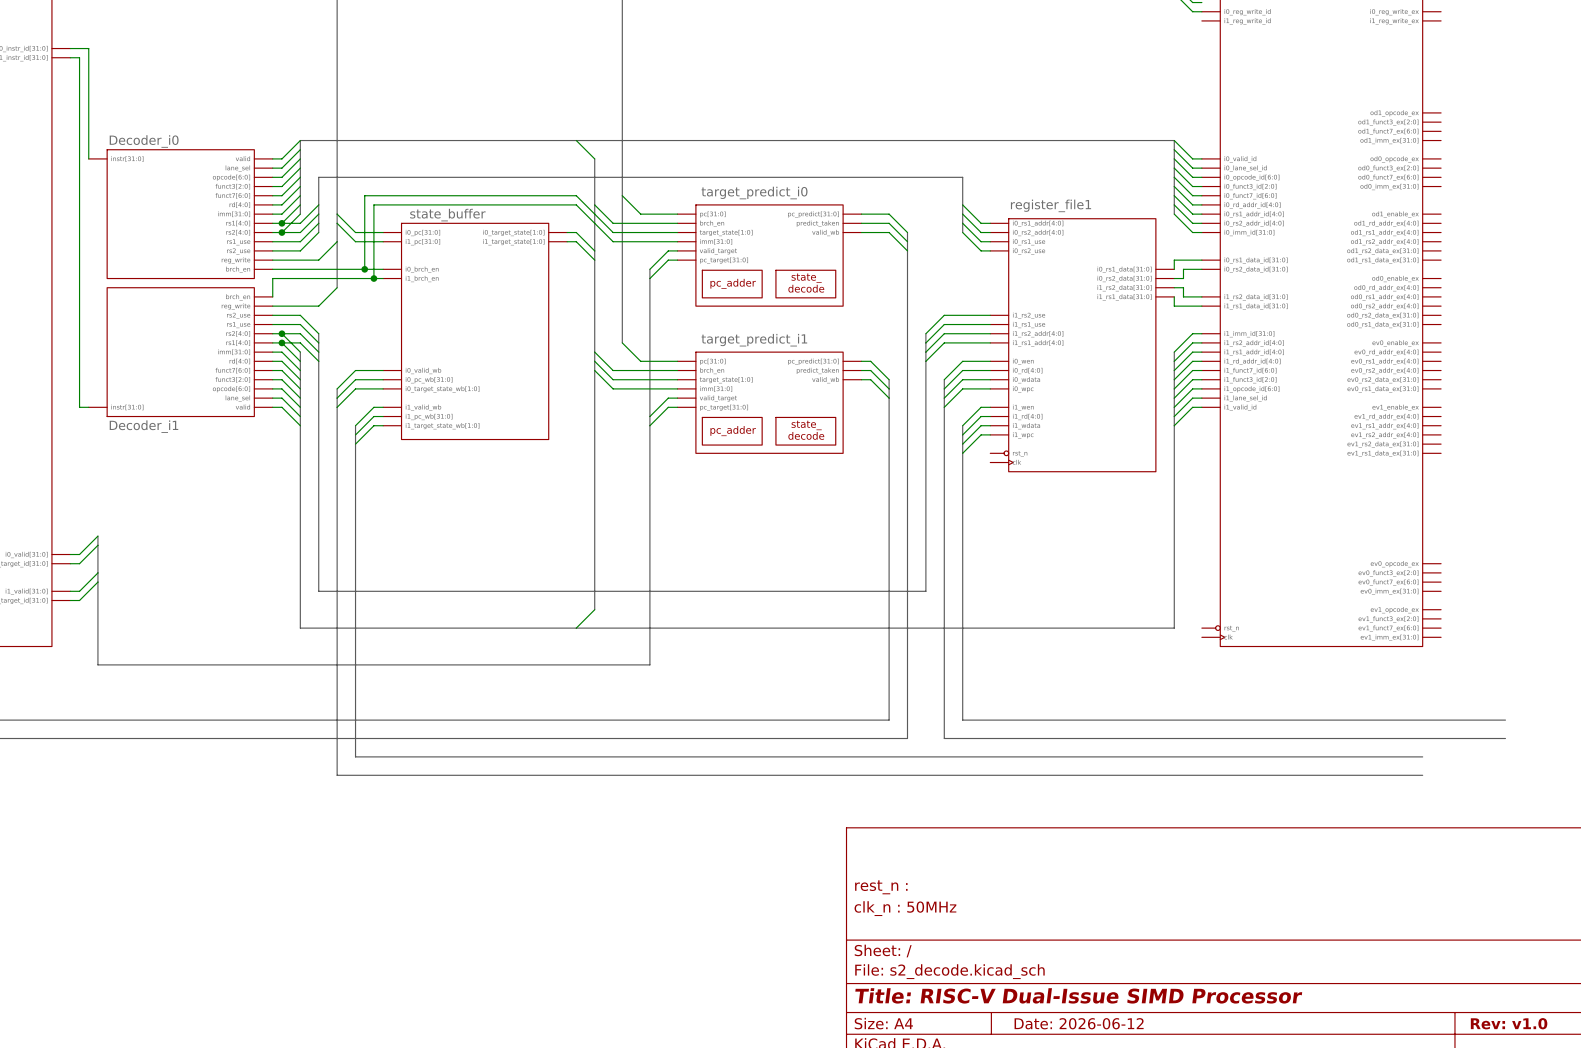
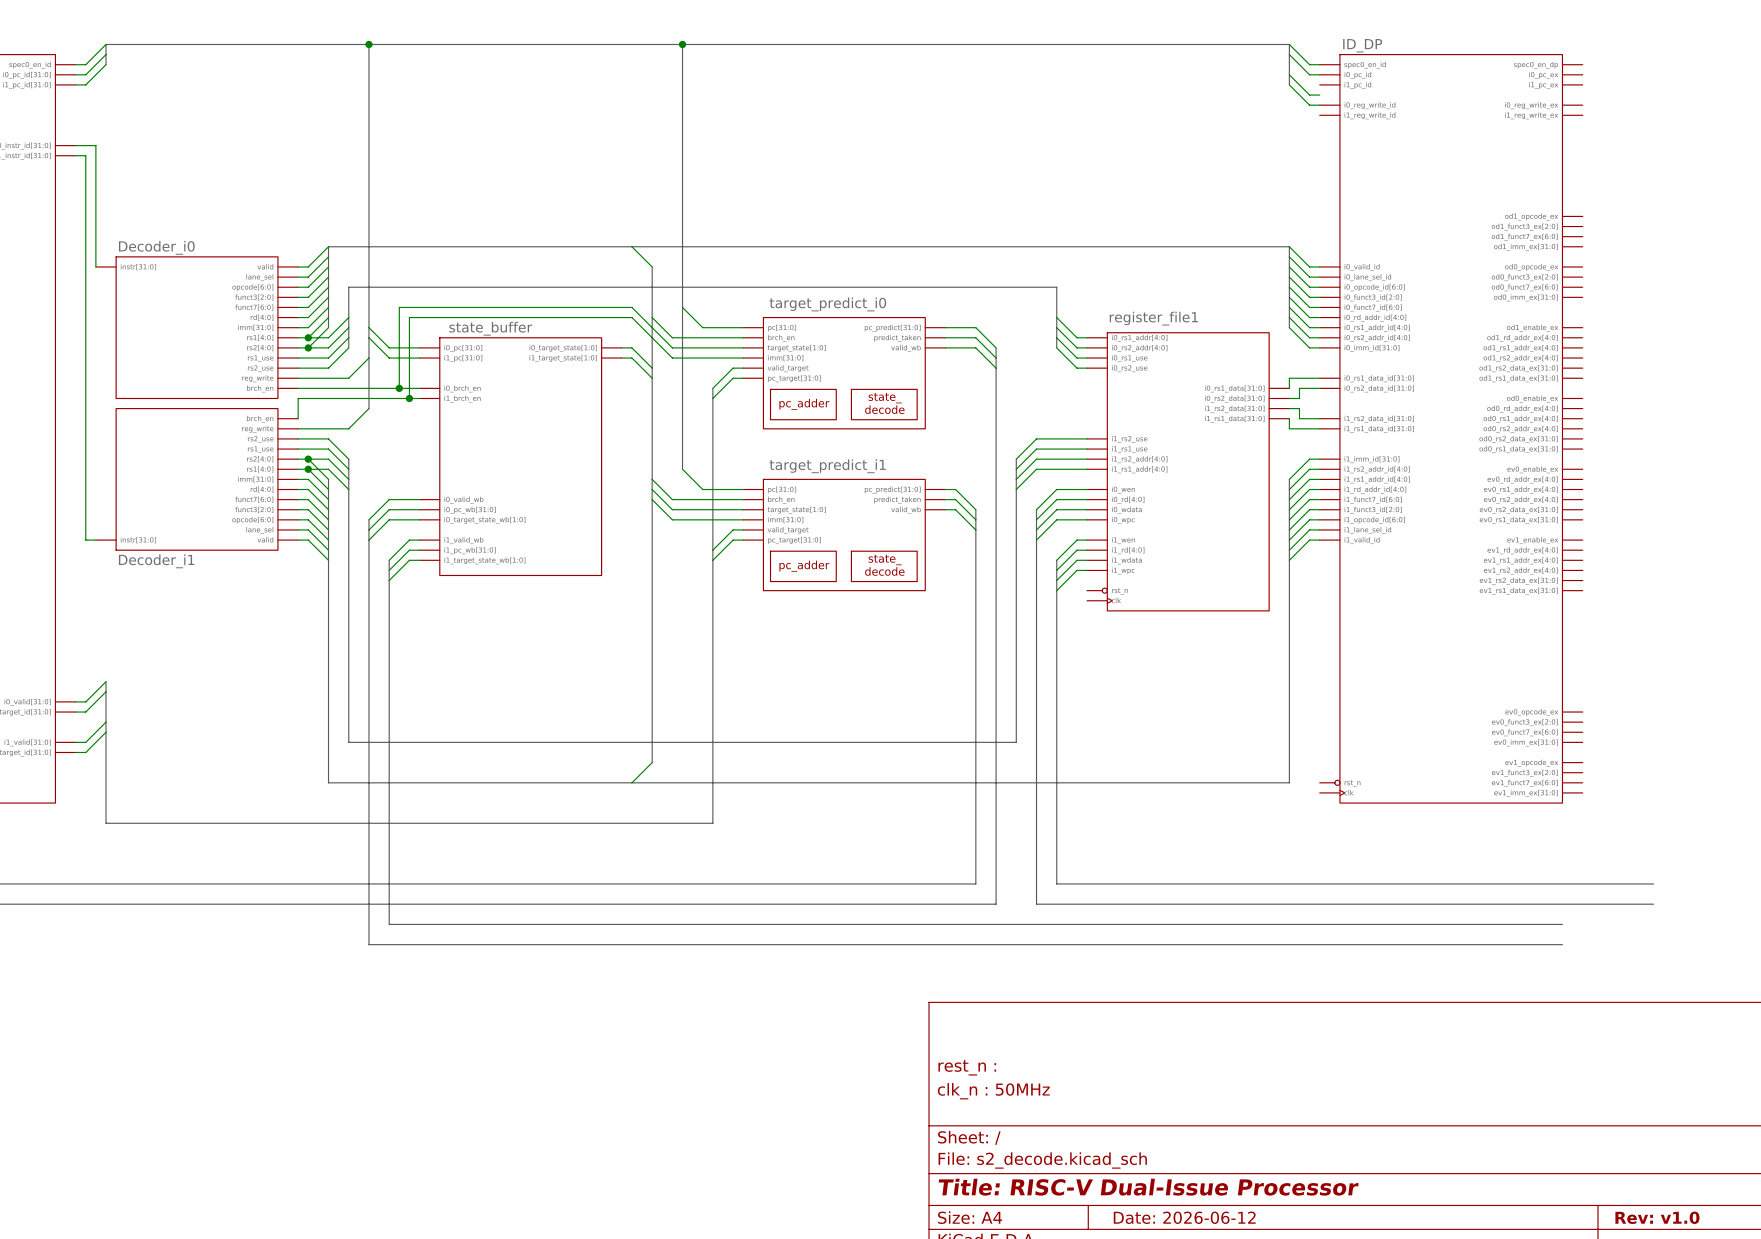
title block: Title: RISC-V Dual-Issue SIMD Processor (1078, 995) -> Title: RISC-V Dual-Issue Processor (1148, 1187)

